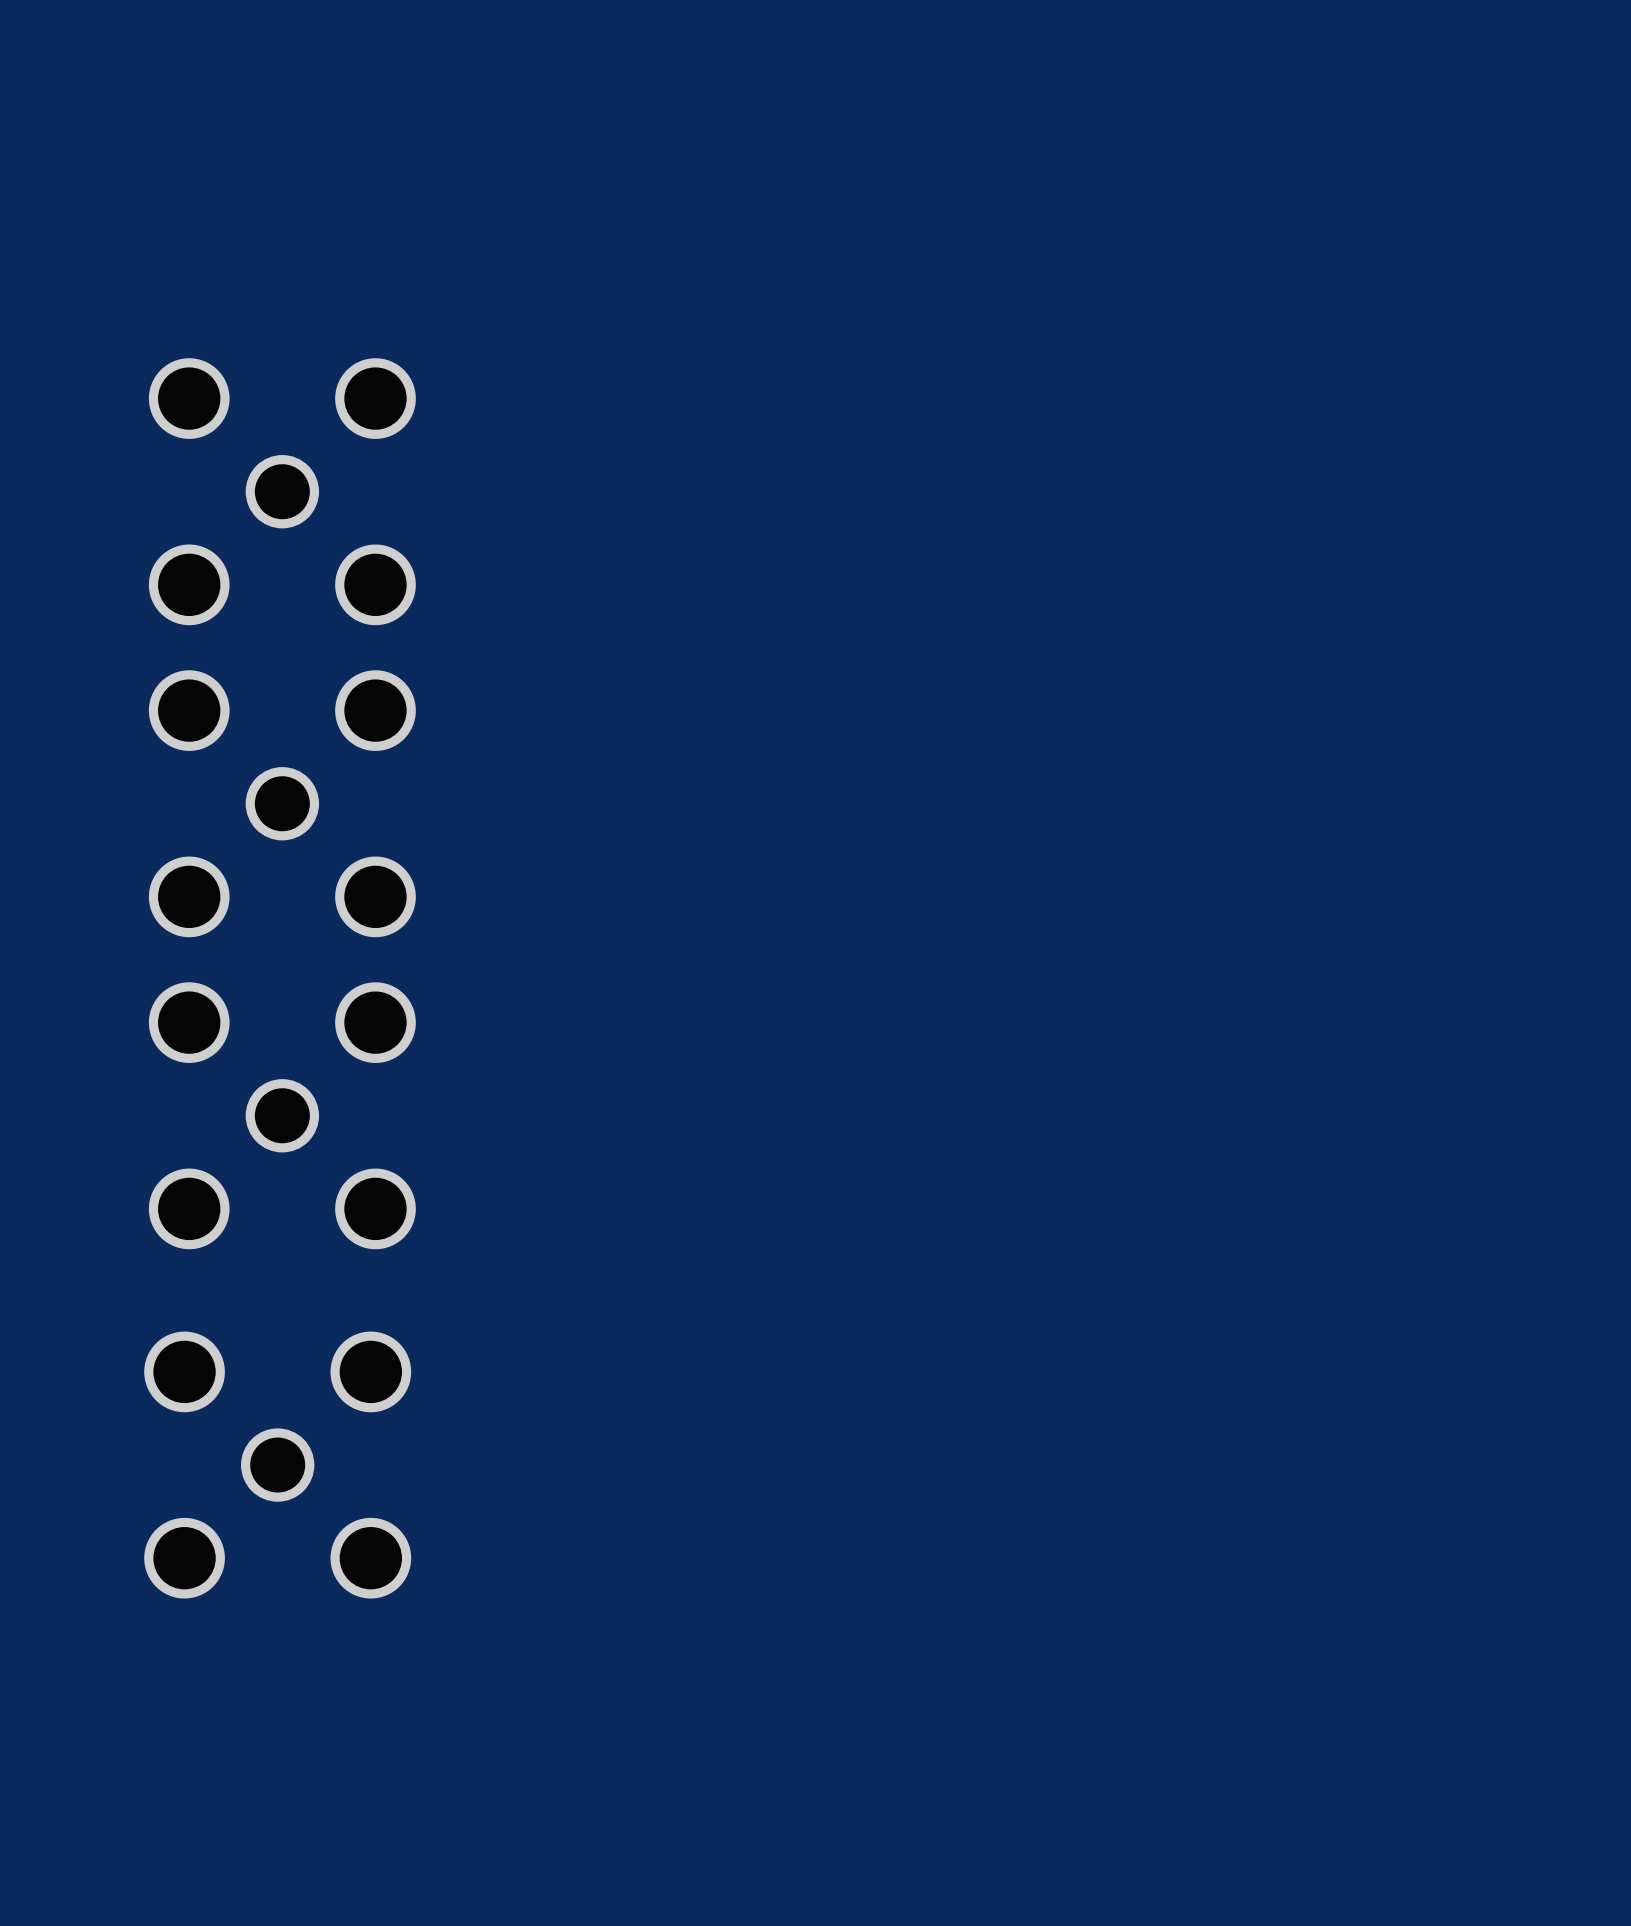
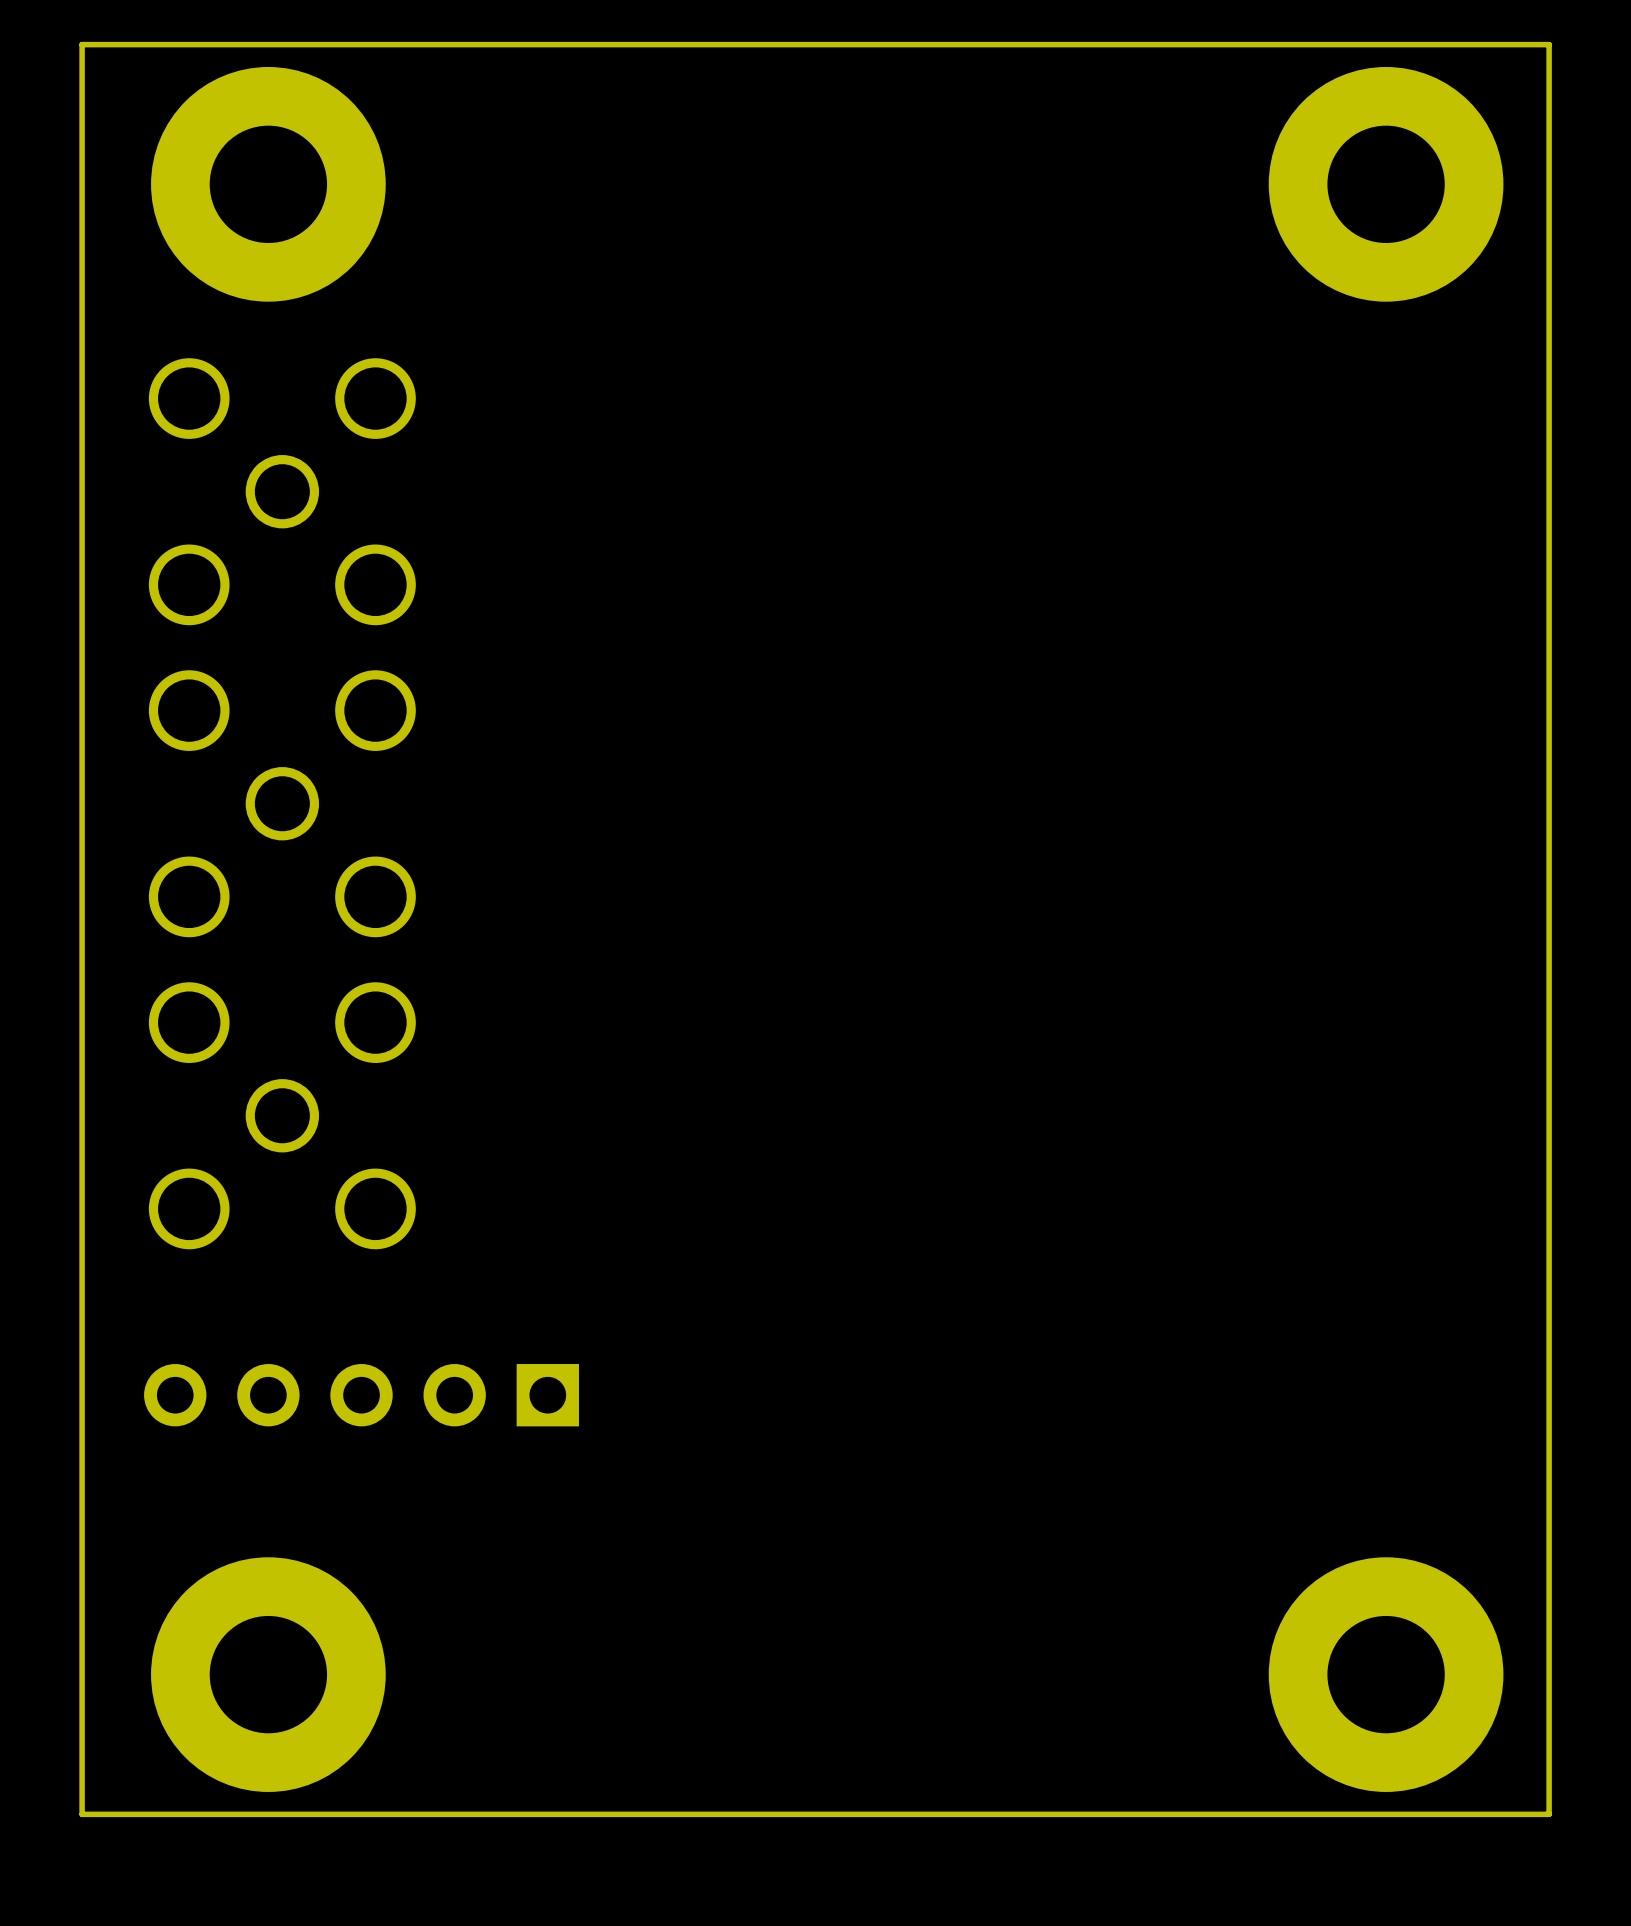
board edge: none -> (1549, 44) (1549, 1814) (82, 1814) (82, 44) (1549, 44)
part: none -> (268, 184)
part: none -> (1386, 184)
part: none -> (361, 1395)
part: (277, 1465) -> none
part: none -> (268, 1674)
part: none -> (1386, 1674)

